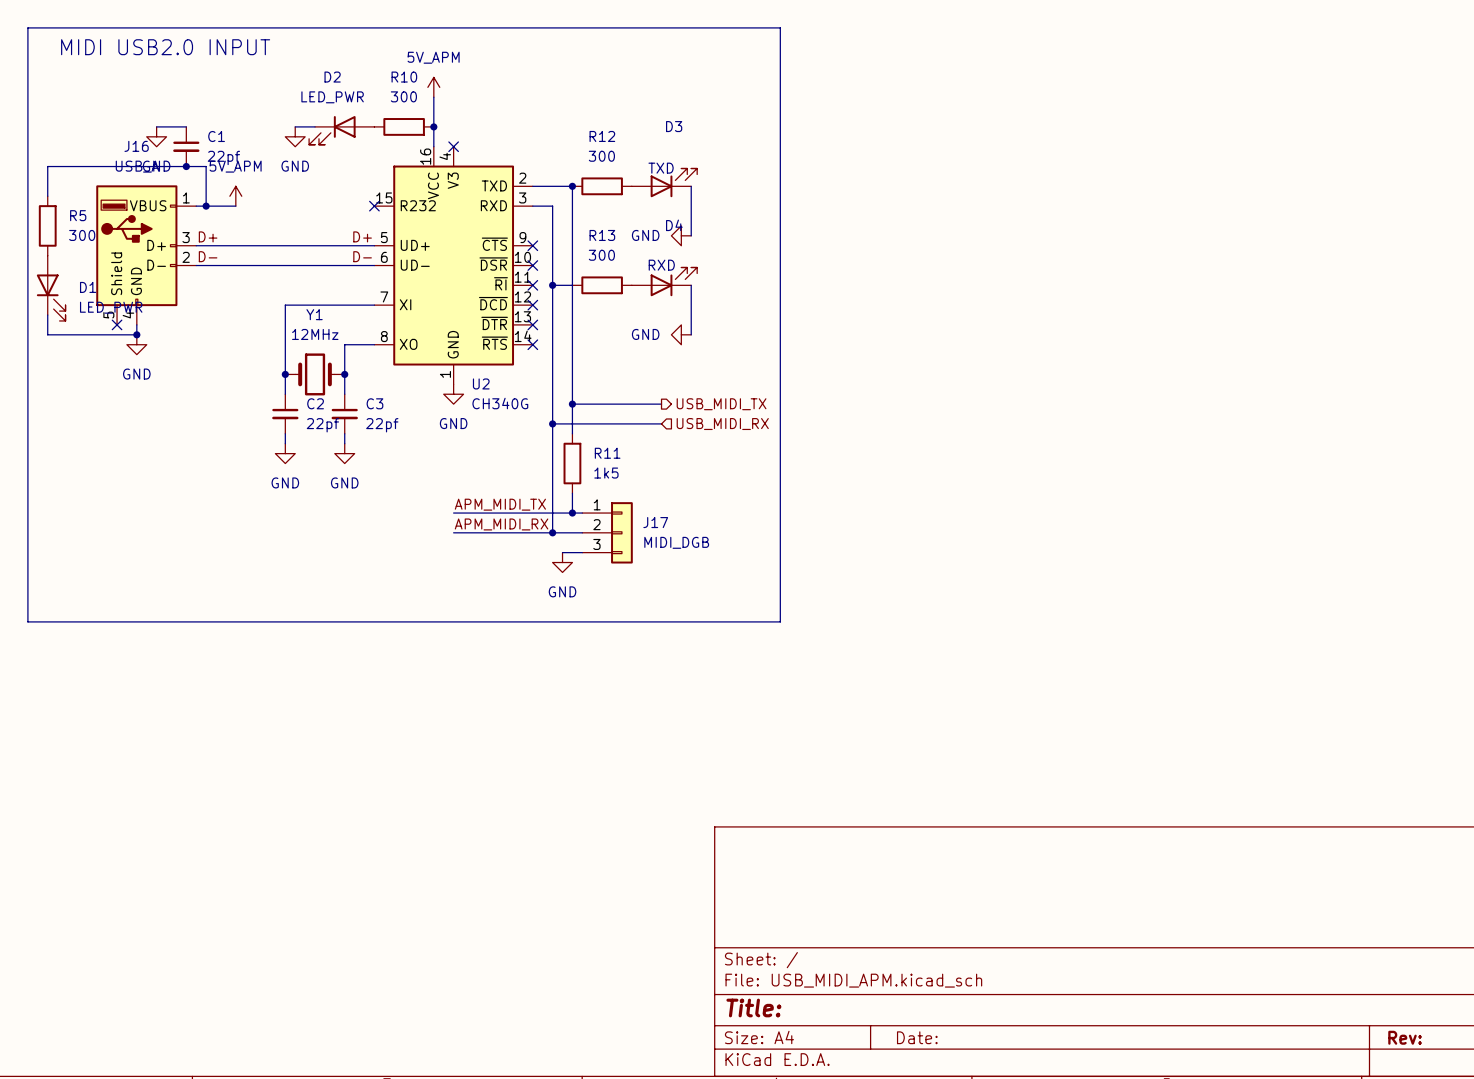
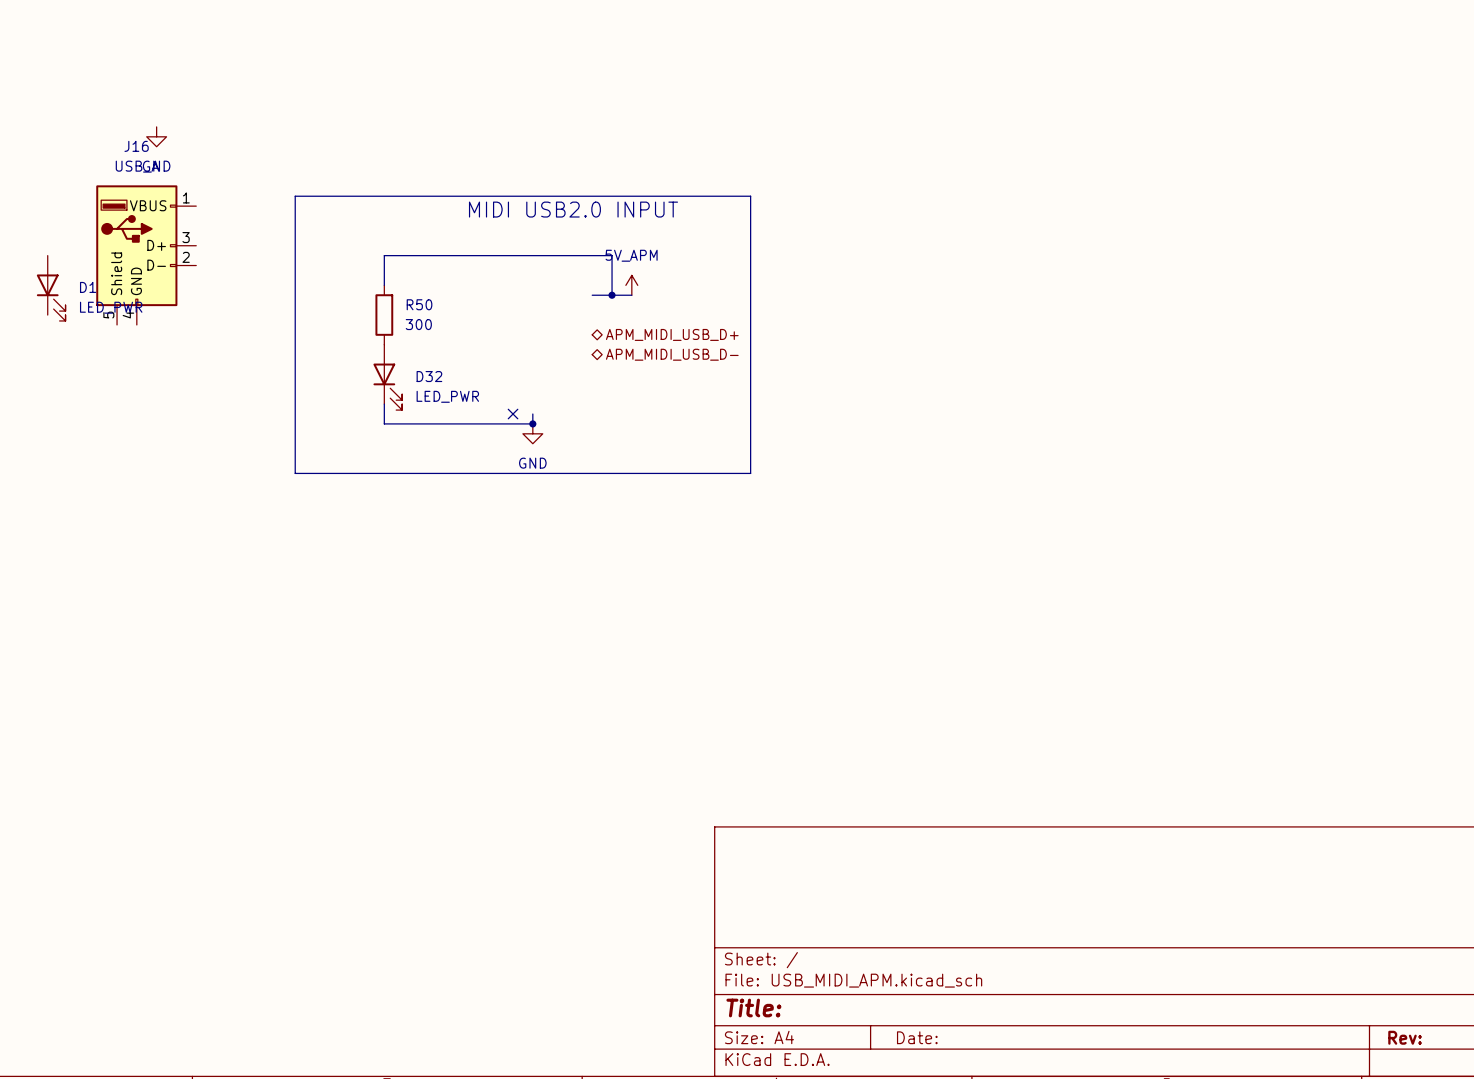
line: (27, 27) (780, 27) (780, 621) (27, 621) (27, 27) -> none
text: MIDI USB2.0 INPUT (165, 47) -> none
power symbol: 5V_APM (433, 87) -> none
wire: (433, 97) (433, 146) -> none
wire: (156, 126) (186, 126) -> none
wire: (295, 126) (315, 126) -> none
R10: 300 (404, 126) -> none
junction: (433, 126) -> none
D2: LED_PWR (341, 130) -> none
power symbol: GND (295, 136) -> none
C1: 22pf (186, 146) -> none
no-connect mark: (453, 146) -> none
junction: (186, 166) -> none
D3: TXD (664, 182) -> none
wire: (532, 186) (572, 186) (572, 433) -> none
junction: (572, 186) -> none
R12: 300 (602, 186) -> none
wire: (691, 186) (691, 235) -> none
wire: (47, 196) (47, 166) (206, 166) (206, 206) -> none
power symbol: 5V_APM (235, 196) -> none
line: none -> (295, 196) (750, 196) (750, 473) (295, 473) (295, 196)
wire: (196, 206) (235, 206) -> none
junction: (206, 206) -> none
no-connect mark: (374, 206) -> none
wire: (532, 206) (552, 206) (552, 532) -> none
text: none -> MIDI USB2.0 INPUT (573, 209)
R5: 300 (47, 225) -> none
power symbol: GND (681, 235) -> none
label: D+ (208, 236) -> none
label: D+ (362, 236) -> none
wire: (196, 245) (374, 245) -> none
no-connect mark: (532, 245) -> none
label: D- (208, 256) -> none
label: D- (362, 256) -> none
wire: (196, 265) (374, 265) -> none
U2: CH340G (453, 265) -> none
no-connect mark: (532, 265) -> none
D4: RXD (664, 281) -> none
wire: none -> (384, 285) (384, 255) (612, 255) (612, 295)
no-connect mark: (532, 285) -> none
wire: (552, 285) (572, 285) -> none
junction: (552, 285) -> none
R13: 300 (602, 285) -> none
power symbol: none -> 5V_APM (631, 285)
wire: (691, 285) (691, 334) -> none
wire: none -> (592, 295) (631, 295)
junction: none -> (612, 295)
wire: (374, 305) (285, 305) (285, 394) -> none
no-connect mark: (532, 305) -> none
wire: (47, 315) (47, 334) (136, 334) (136, 324) -> none
R50: none -> 300 (384, 315)
no-connect mark: (117, 324) -> none
no-connect mark: (532, 324) -> none
junction: (136, 334) -> none
hierarchical label: none -> APM_MIDI_USB_D+ (672, 334)
power symbol: GND (681, 334) -> none
power symbol: GND (136, 344) -> none
wire: (374, 344) (344, 344) (344, 394) -> none
no-connect mark: (532, 344) -> none
hierarchical label: none -> APM_MIDI_USB_D- (672, 354)
junction: (285, 374) -> none
Y1: 12MHz (315, 374) -> none
junction: (344, 374) -> none
D32: none -> LED_PWR (387, 377)
power symbol: GND (453, 394) -> none
wire: none -> (384, 404) (384, 423) (532, 423) (532, 414)
wire: (572, 404) (661, 404) -> none
junction: (572, 404) -> none
hierarchical label: USB_MIDI_TX (721, 404) -> none
C2: 22pf (285, 414) -> none
C3: 22pf (344, 414) -> none
no-connect mark: none -> (513, 414)
wire: (552, 423) (661, 423) -> none
junction position: (552, 423) -> (532, 423)
hierarchical label: USB_MIDI_RX (722, 424) -> none
wire: (285, 433) (285, 443) -> none
wire: (344, 433) (344, 443) -> none
power symbol: none -> GND (532, 433)
power symbol: GND (285, 453) -> none
power symbol: GND (344, 453) -> none
R11: 1k5 (572, 463) -> none
wire: (572, 493) (572, 513) -> none
label: APM_MIDI_TX (500, 504) -> none
wire: (453, 513) (582, 513) -> none
junction: (572, 513) -> none
label: APM_MIDI_RX (501, 524) -> none
wire: (453, 532) (582, 532) -> none
junction: (552, 532) -> none
J17: MIDI_DGB (607, 532) -> none
wire: (562, 552) (582, 552) -> none
power symbol: GND (562, 562) -> none

